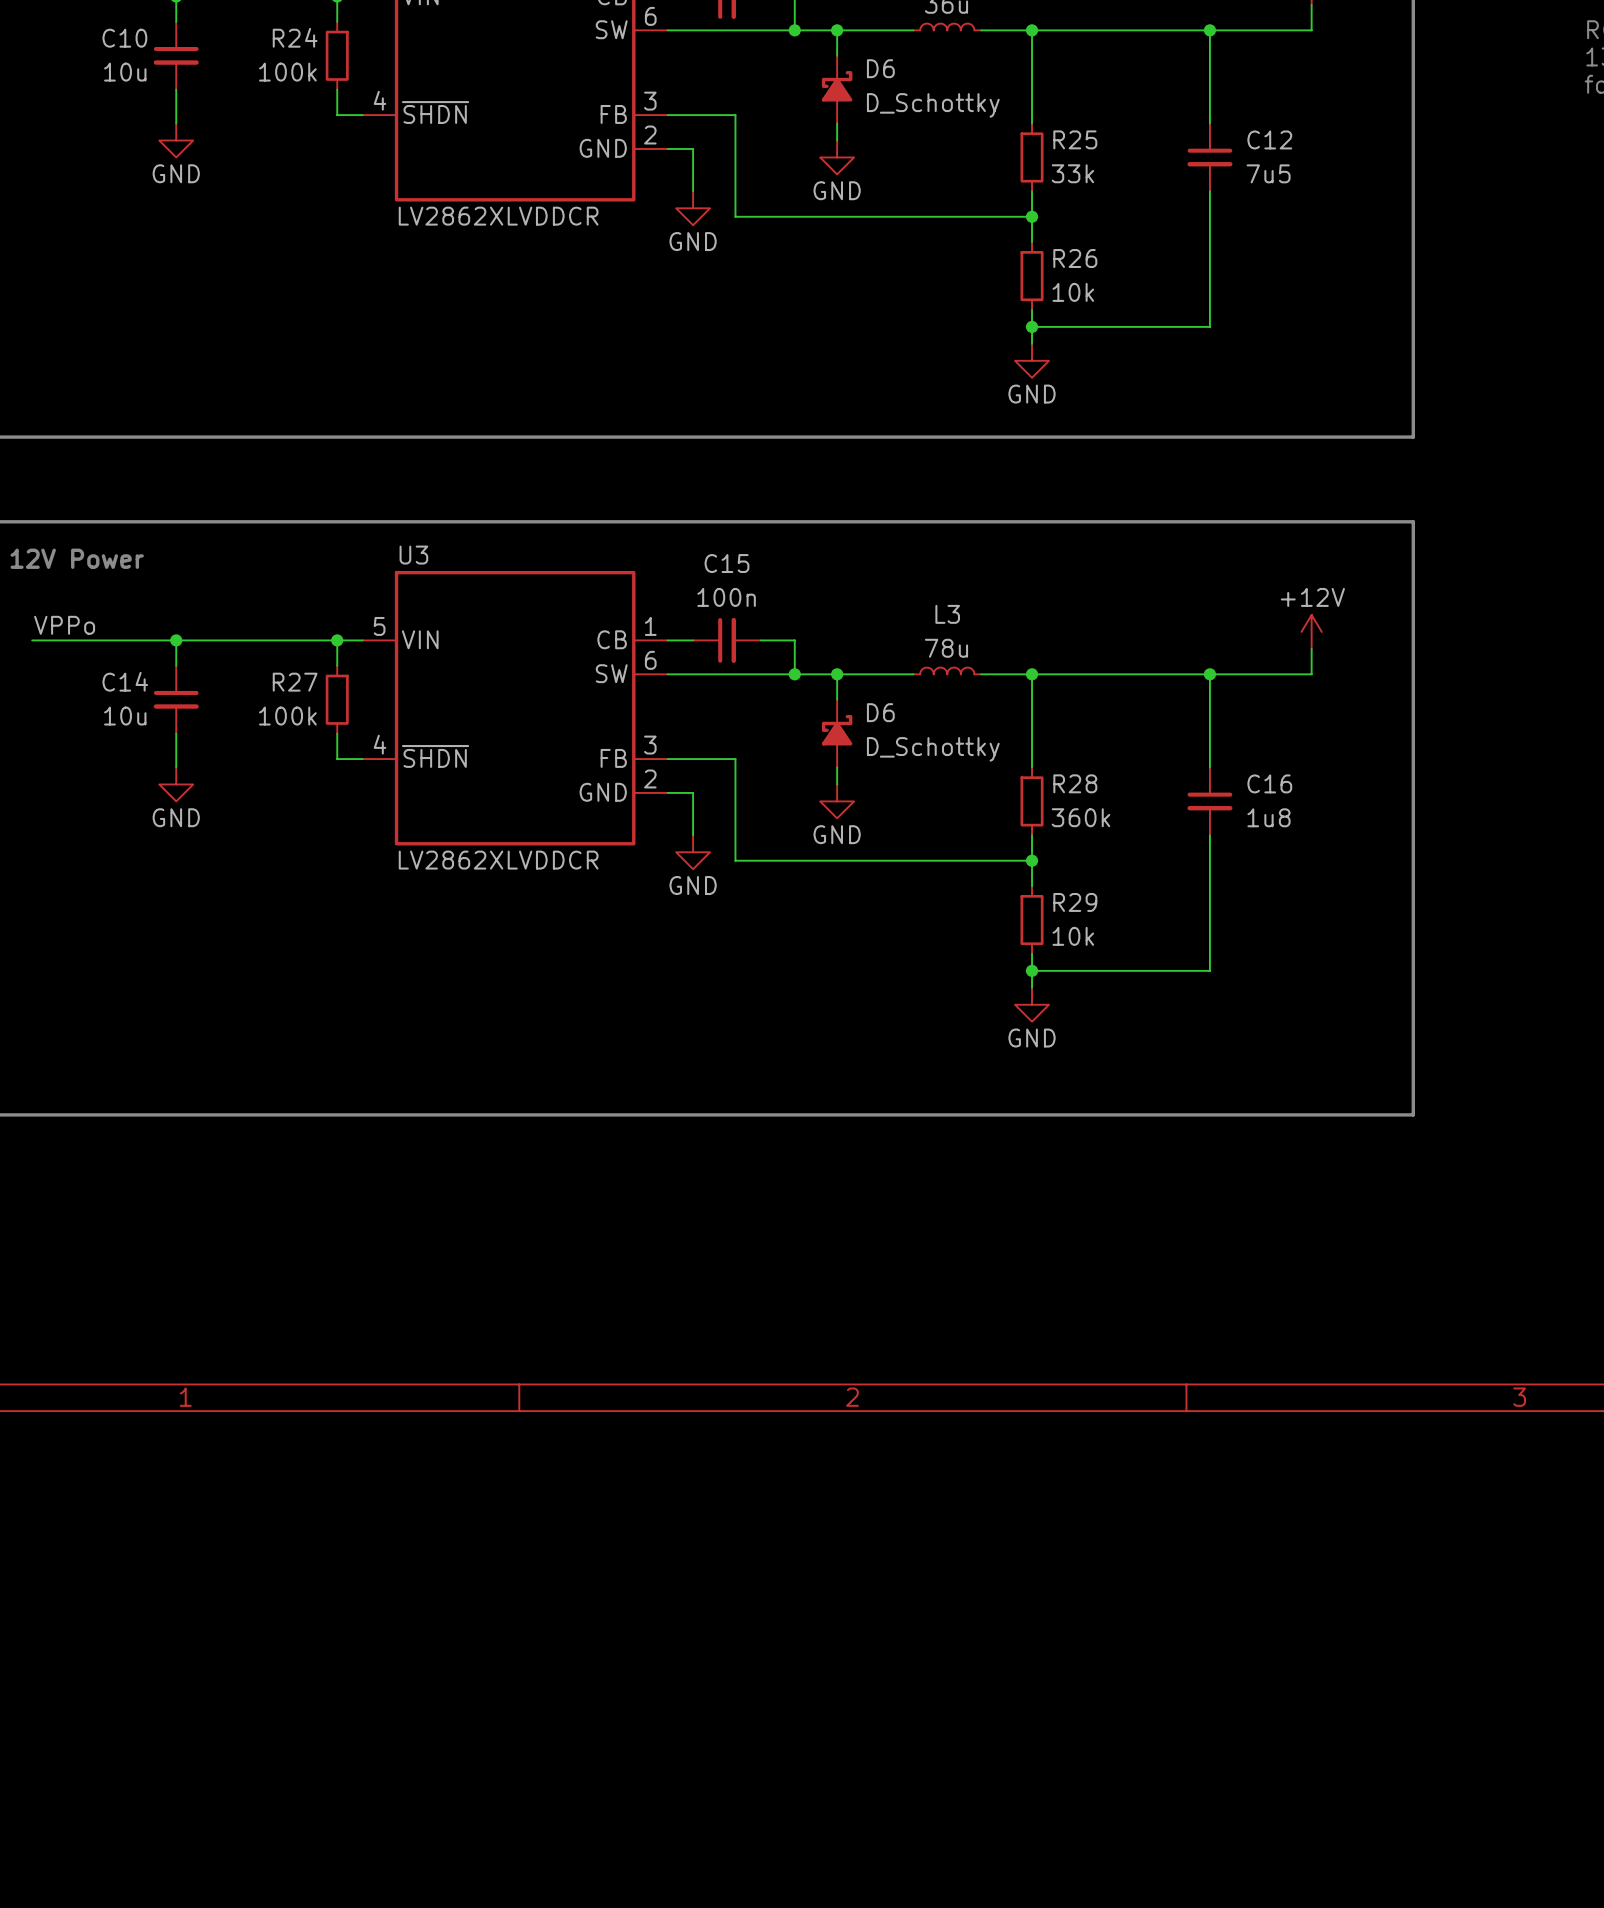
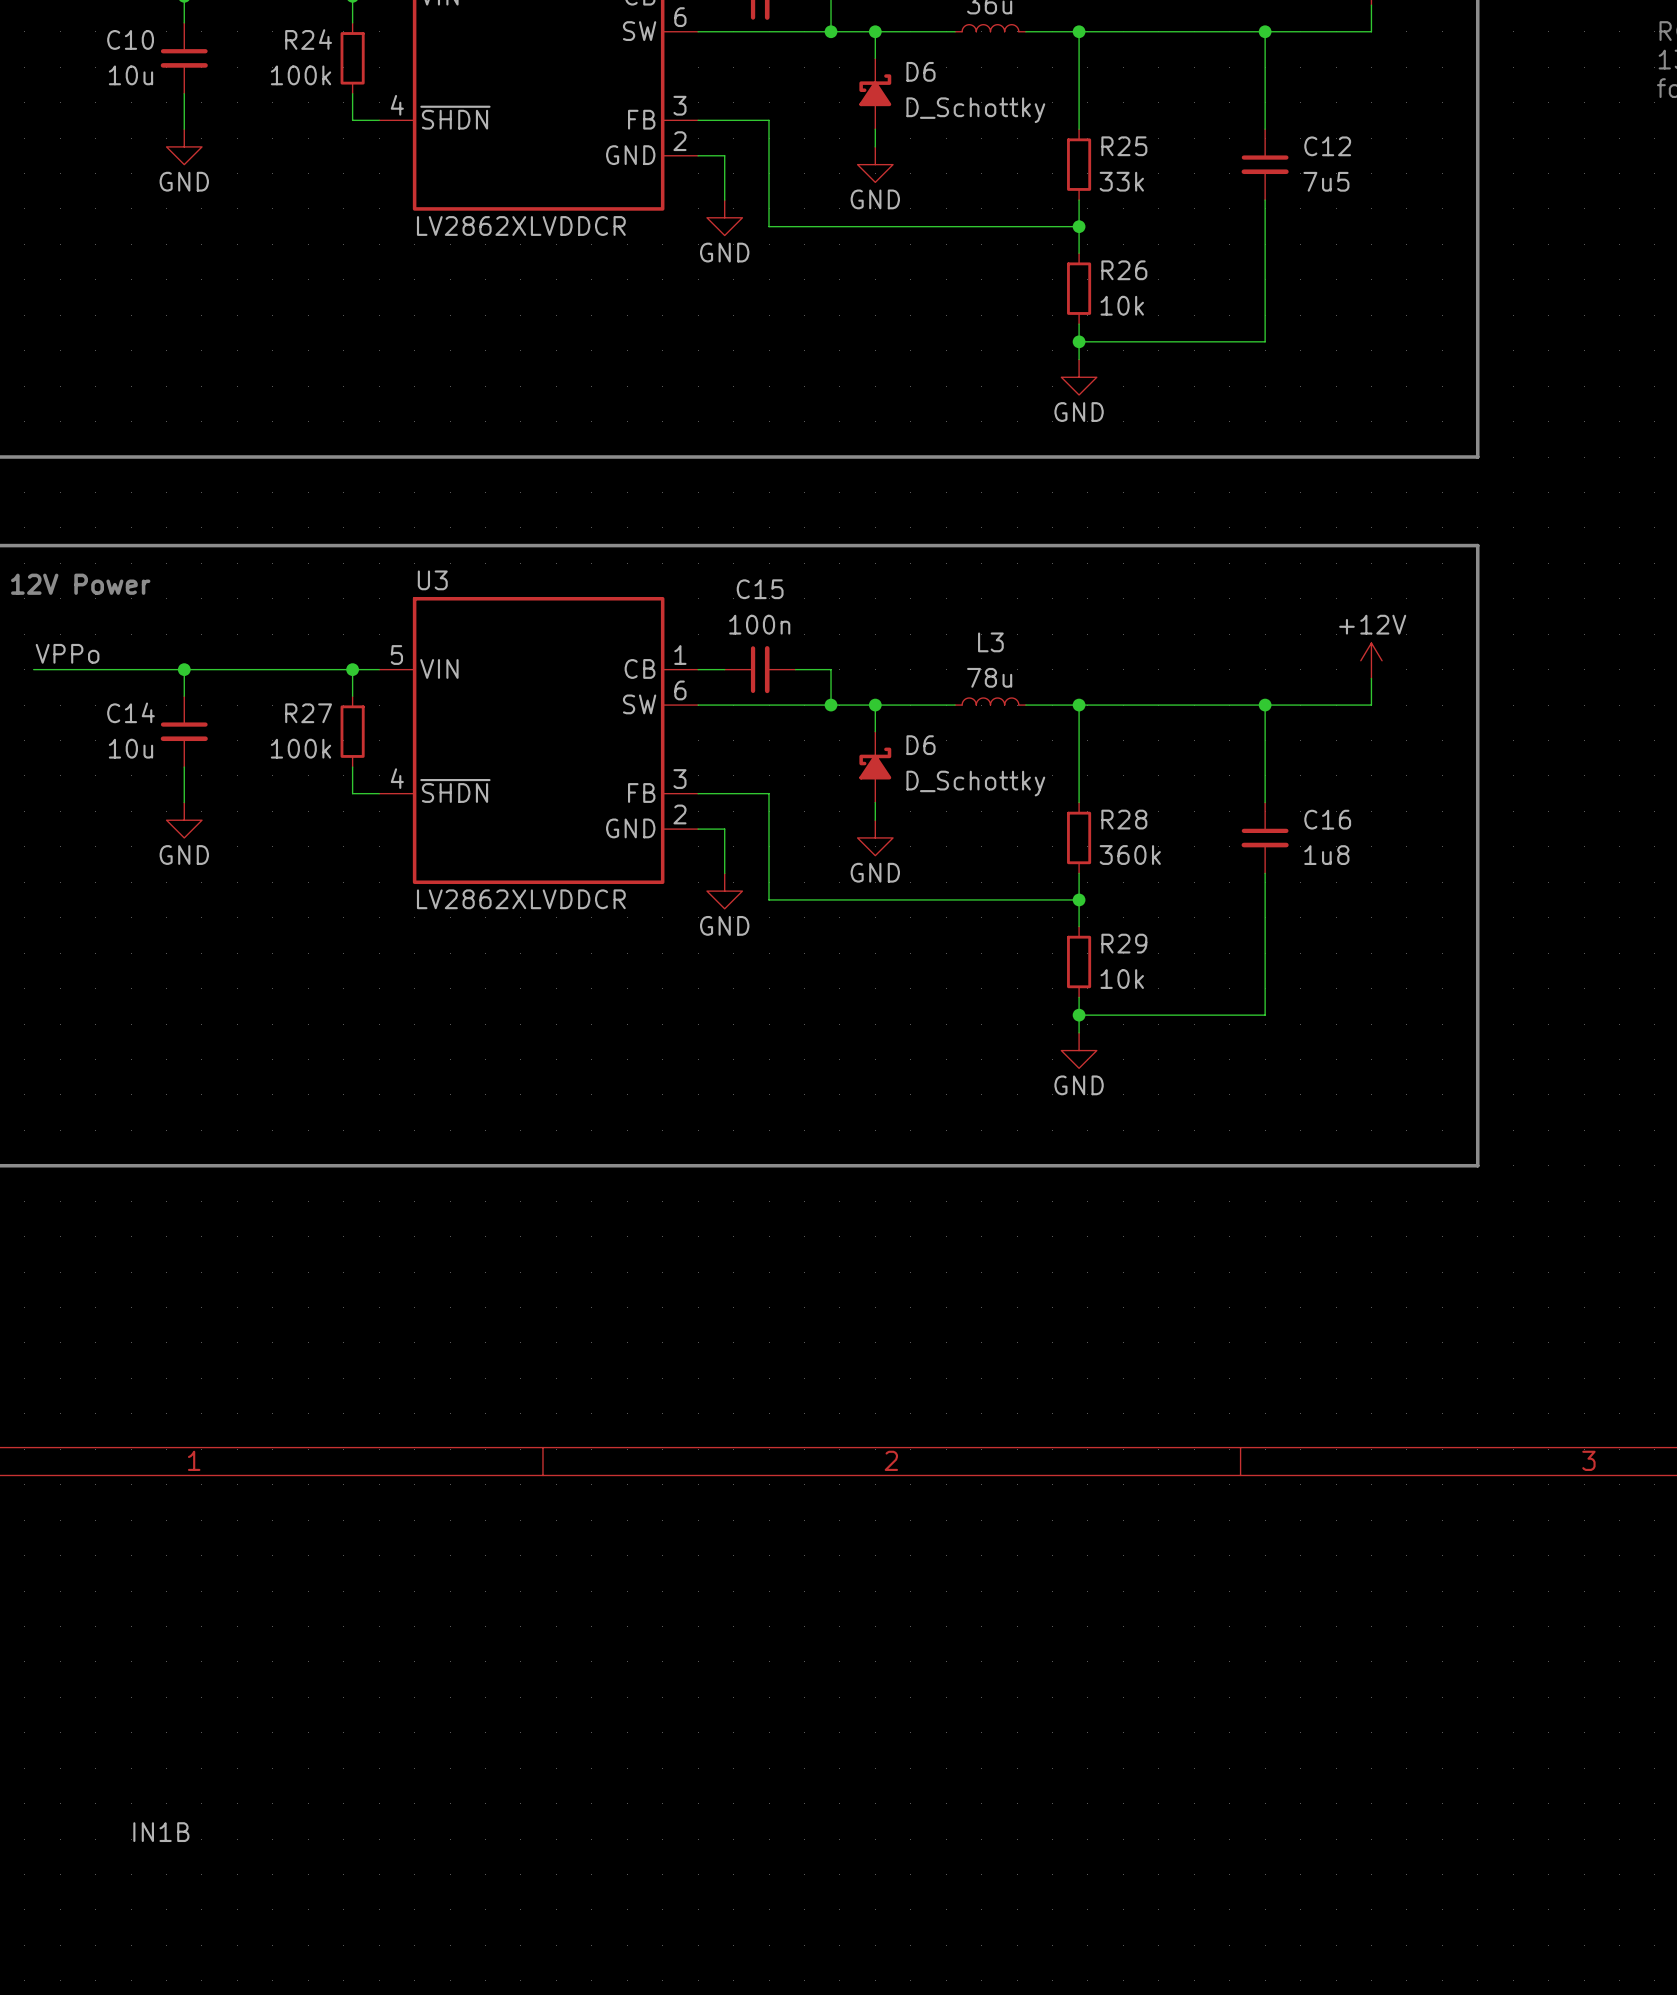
label: none -> IN1B (161, 1832)

